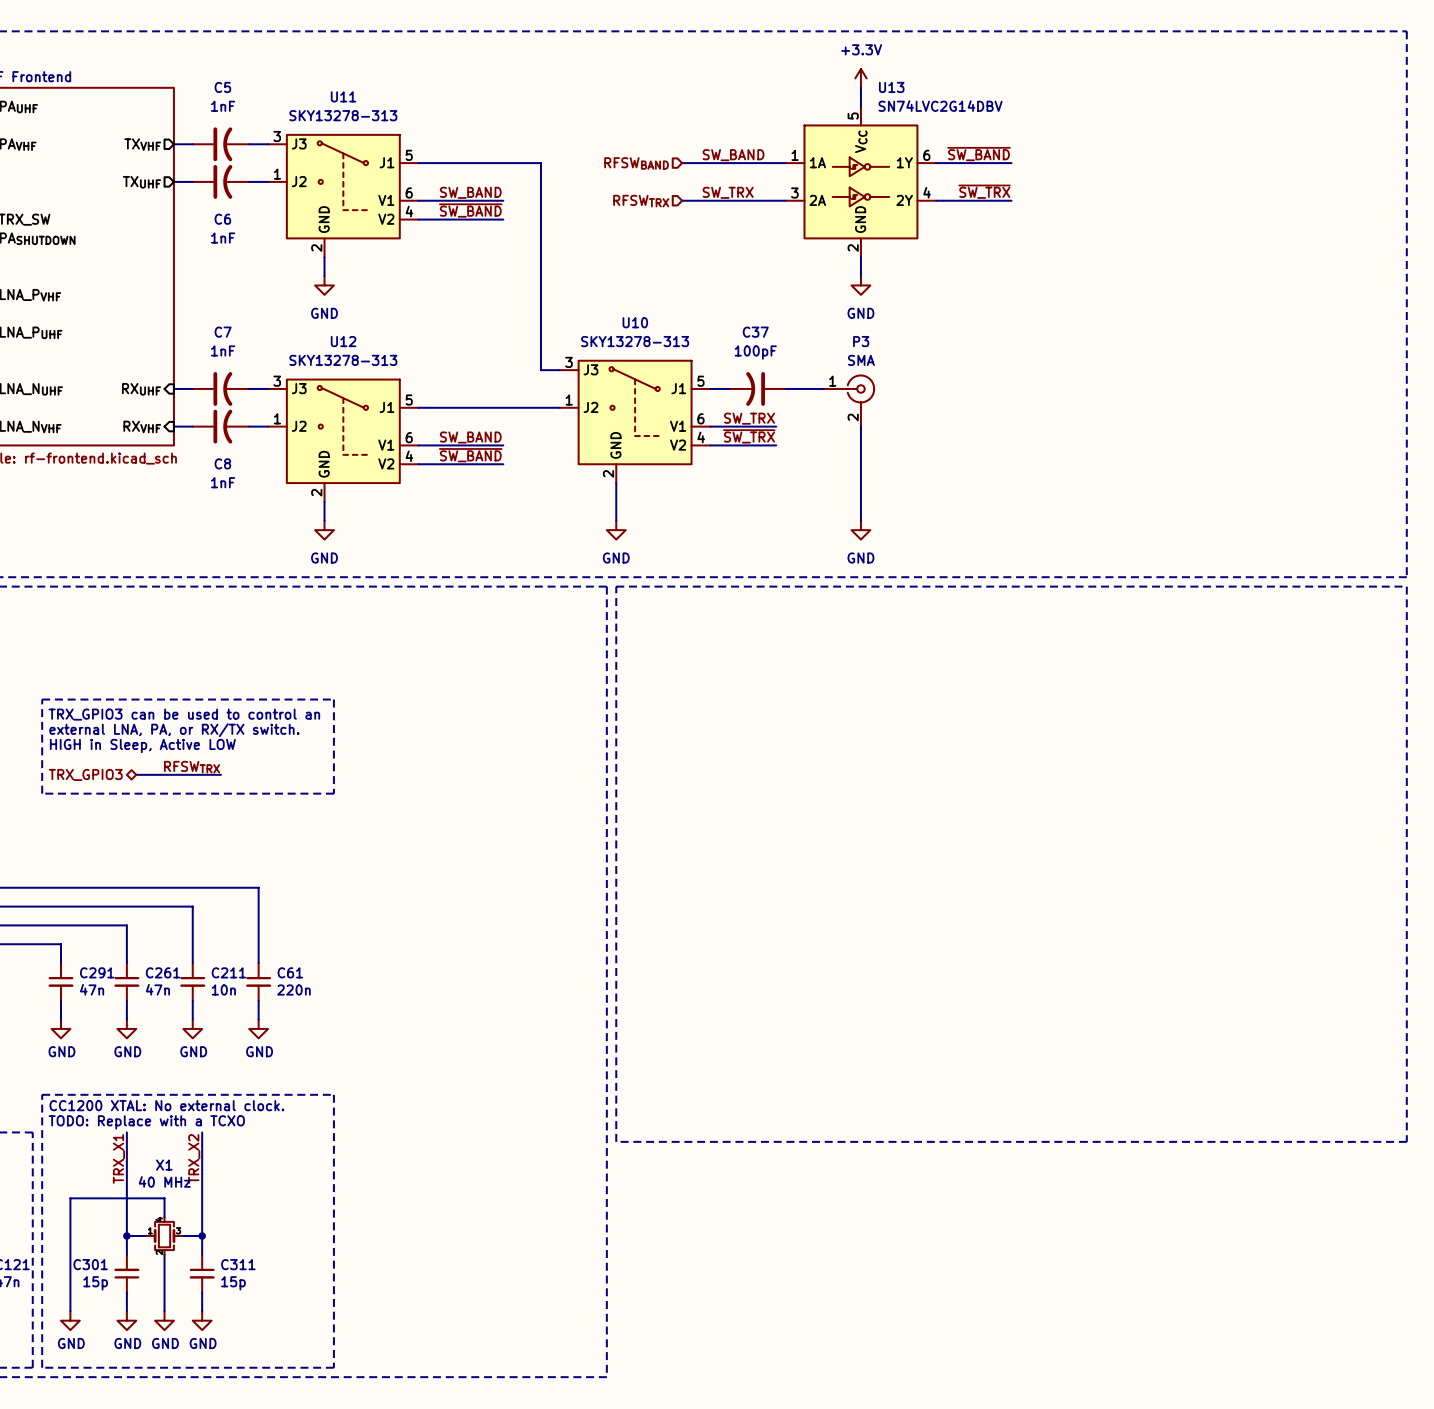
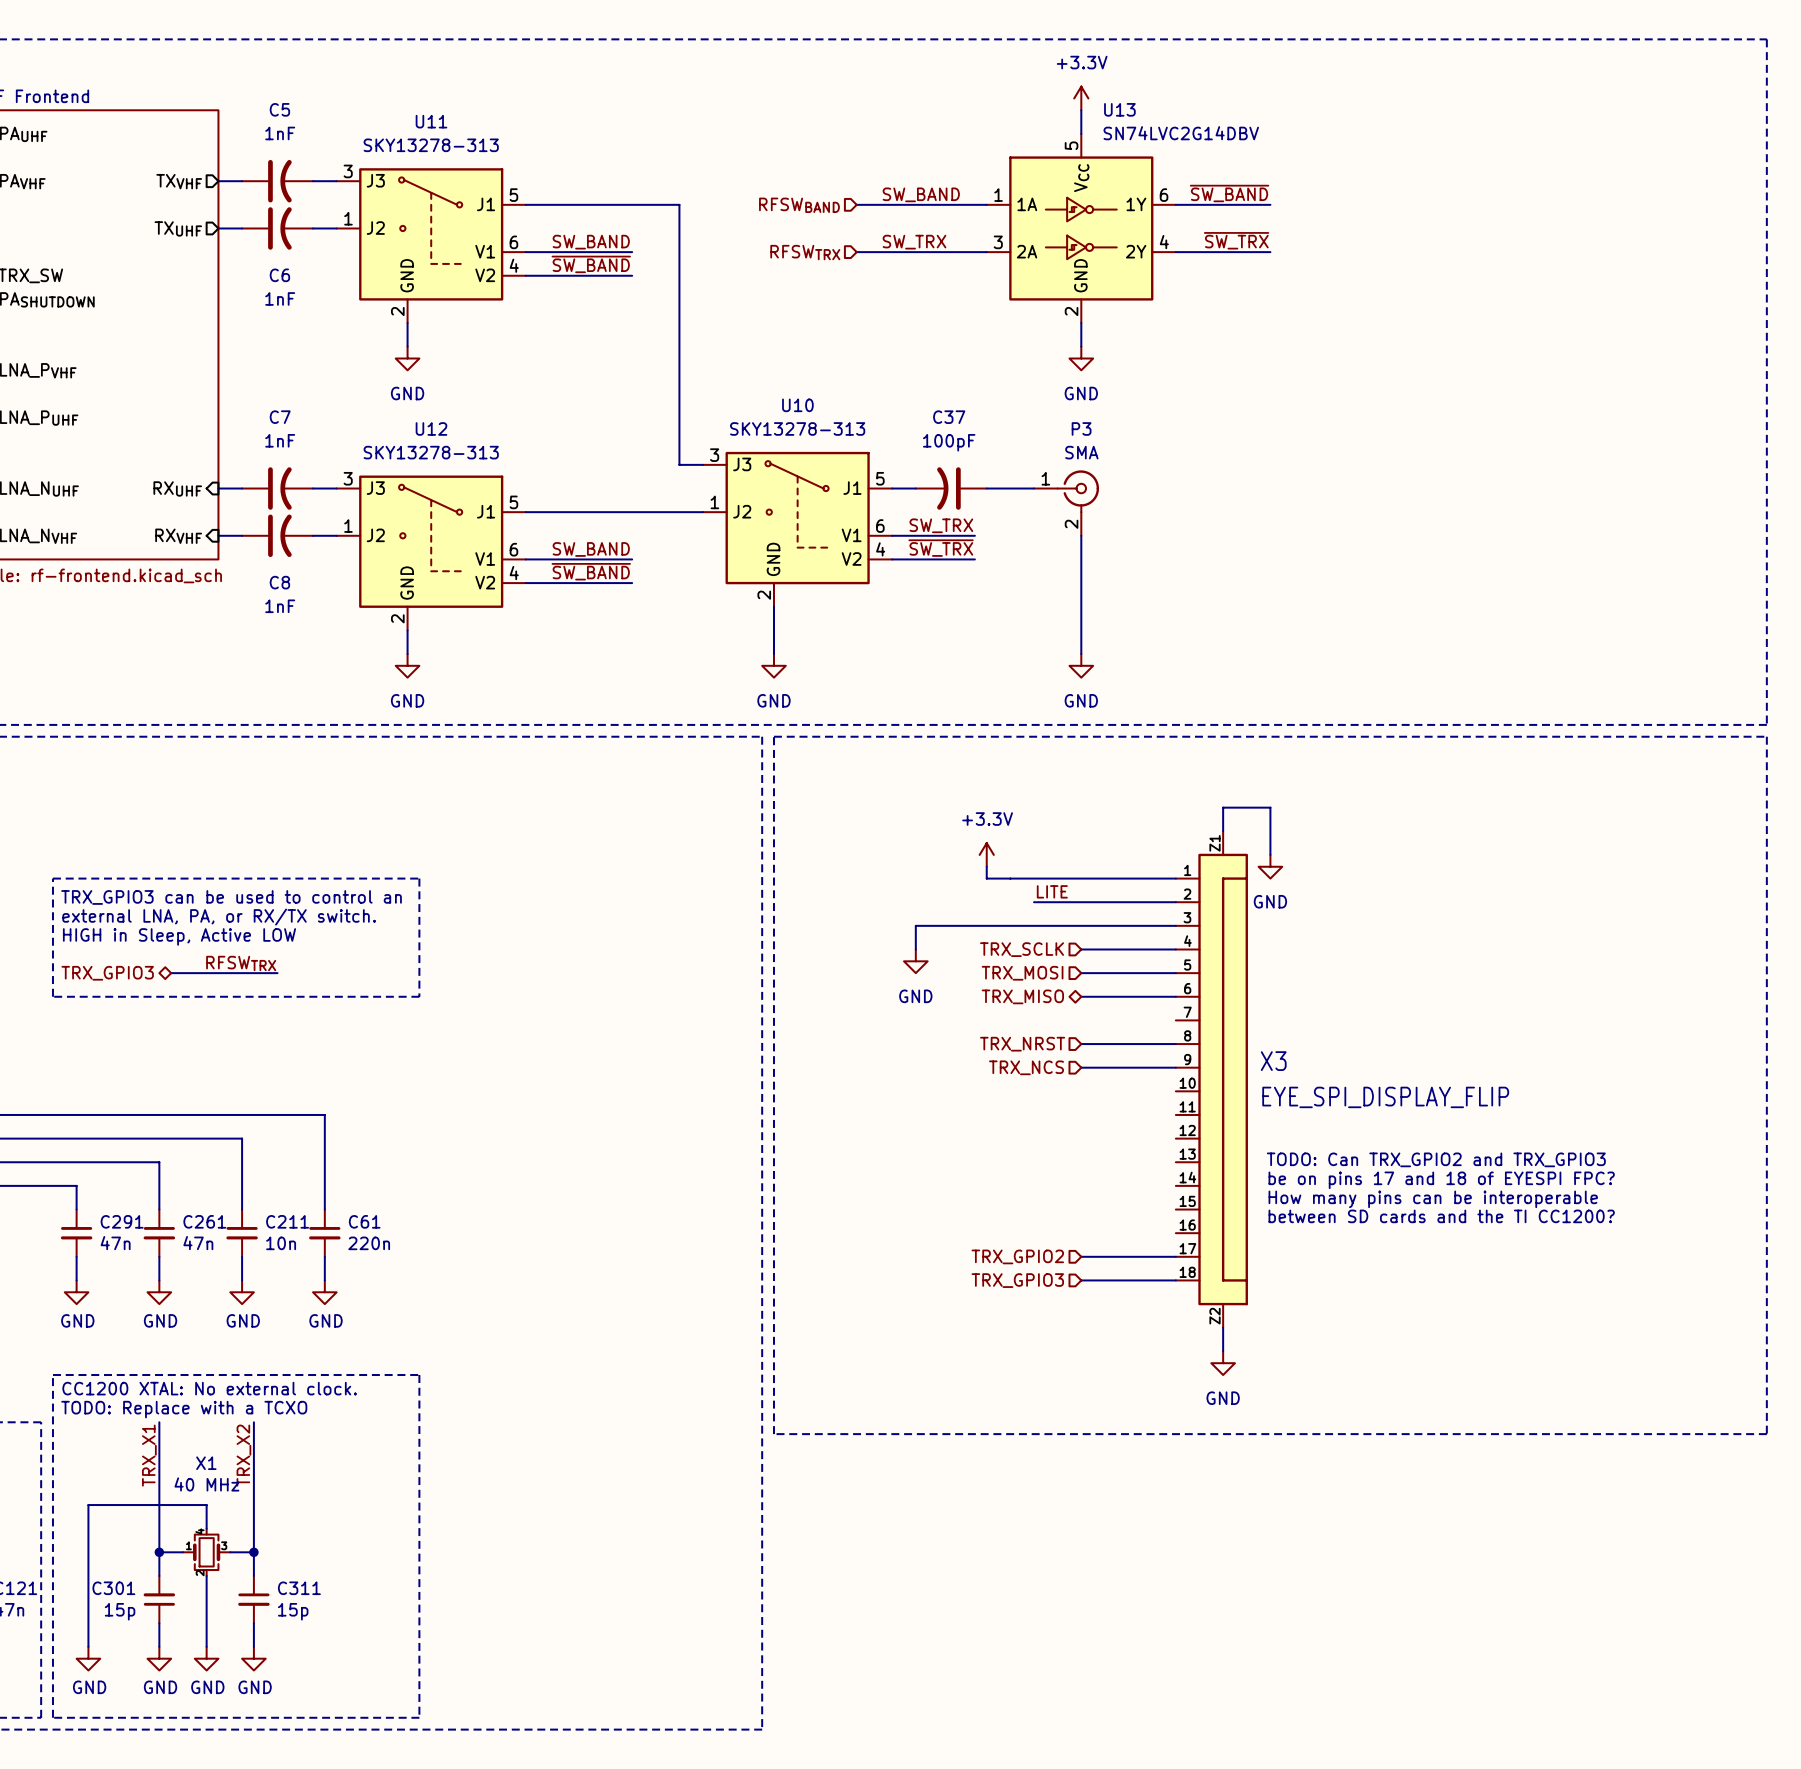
wire: none -> (1223, 831) (1223, 807) (1270, 807) (1270, 854)
power symbol: none -> +3.3V (986, 854)
wire: none -> (986, 866) (986, 878) (1175, 878)
power symbol: none -> GND (1270, 866)
label: none -> LITE (1052, 891)
wire: none -> (1034, 902) (1175, 902)
wire: none -> (1175, 925) (915, 925) (915, 949)
hierarchical label: none -> TRX_SCLK (1022, 949)
wire: none -> (1081, 949) (1175, 949)
power symbol: none -> GND (915, 961)
hierarchical label: none -> TRX_MOSI (1022, 973)
wire: none -> (1081, 973) (1175, 973)
hierarchical label: none -> TRX_MISO (1022, 996)
wire: none -> (1081, 996) (1175, 996)
hierarchical label: none -> TRX_NRST (1022, 1044)
wire: none -> (1081, 1044) (1175, 1044)
hierarchical label: none -> TRX_NCS (1026, 1067)
wire: none -> (1081, 1067) (1175, 1067)
X3: none -> EYE_SPI_DISPLAY_FLIP (1211, 1079)
text: none -> TODO: Can TRX_GPIO2 and TRX_GPIO3 (1436, 1159)
text: none -> be on pins 17 and 18 of EYESPI FPC? (1441, 1180)
text: none -> How many pins can be interoperable (1433, 1199)
text: none -> between SD cards and the TI CC1200? (1441, 1216)
hierarchical label: none -> TRX_GPIO2 (1017, 1256)
wire: none -> (1081, 1256) (1175, 1256)
hierarchical label: none -> TRX_GPIO3 (1017, 1280)
wire: none -> (1081, 1280) (1175, 1280)
wire: none -> (1223, 1327) (1223, 1351)
power symbol: none -> GND (1223, 1363)

